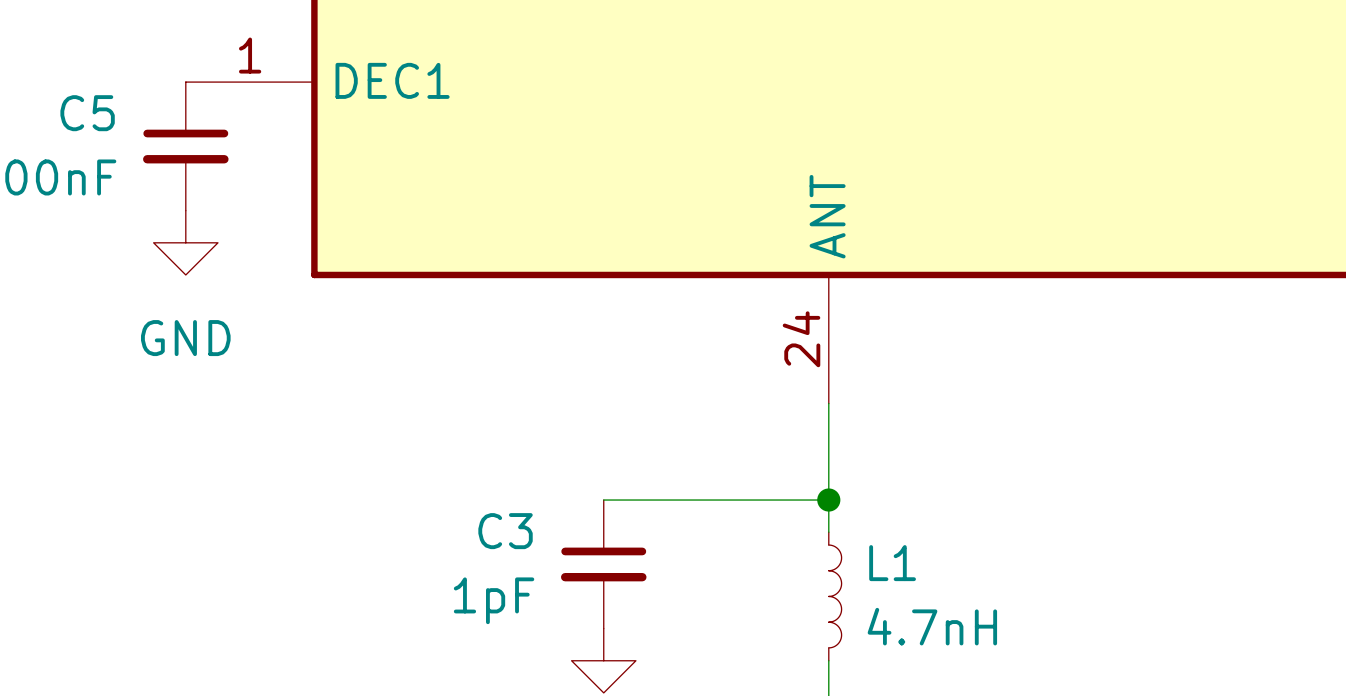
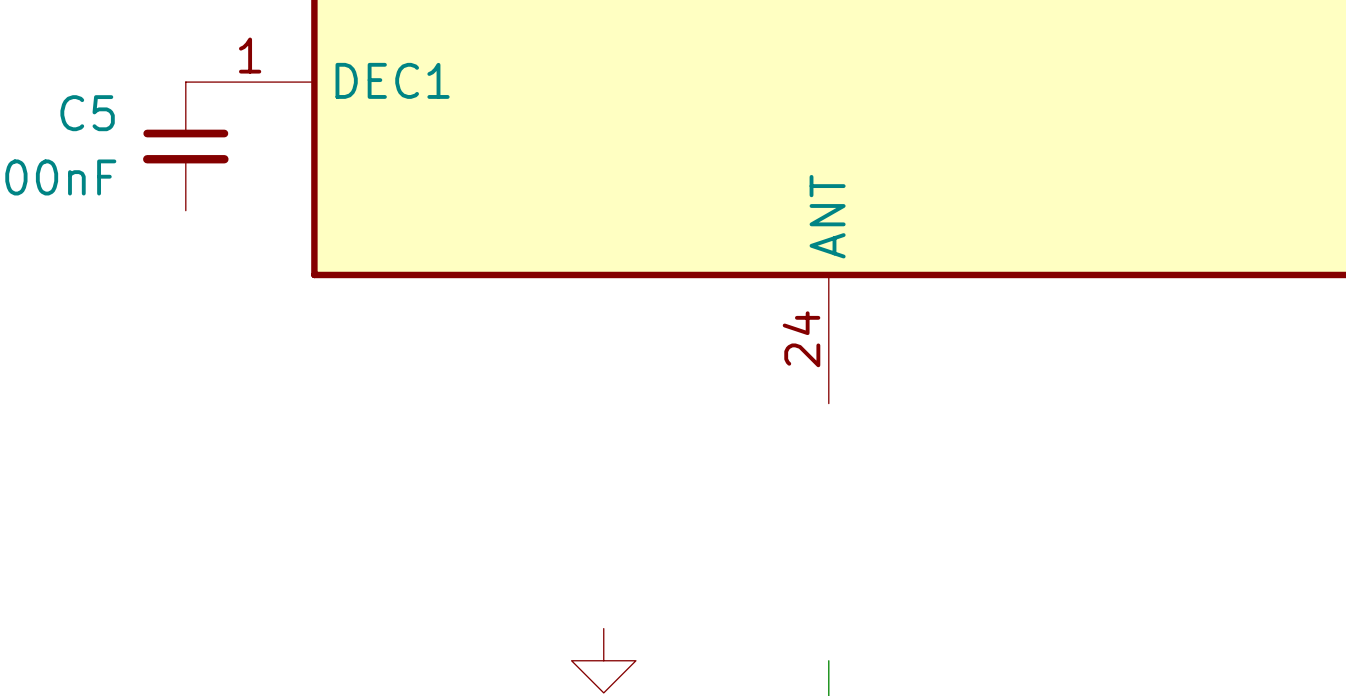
power symbol: GND (185, 242) -> none
wire: (828, 403) (828, 532) -> none
wire: (603, 500) (828, 500) -> none
junction: (828, 500) -> none
C3: 1pF (603, 564) -> none
L1: 4.7nH (835, 596) -> none

